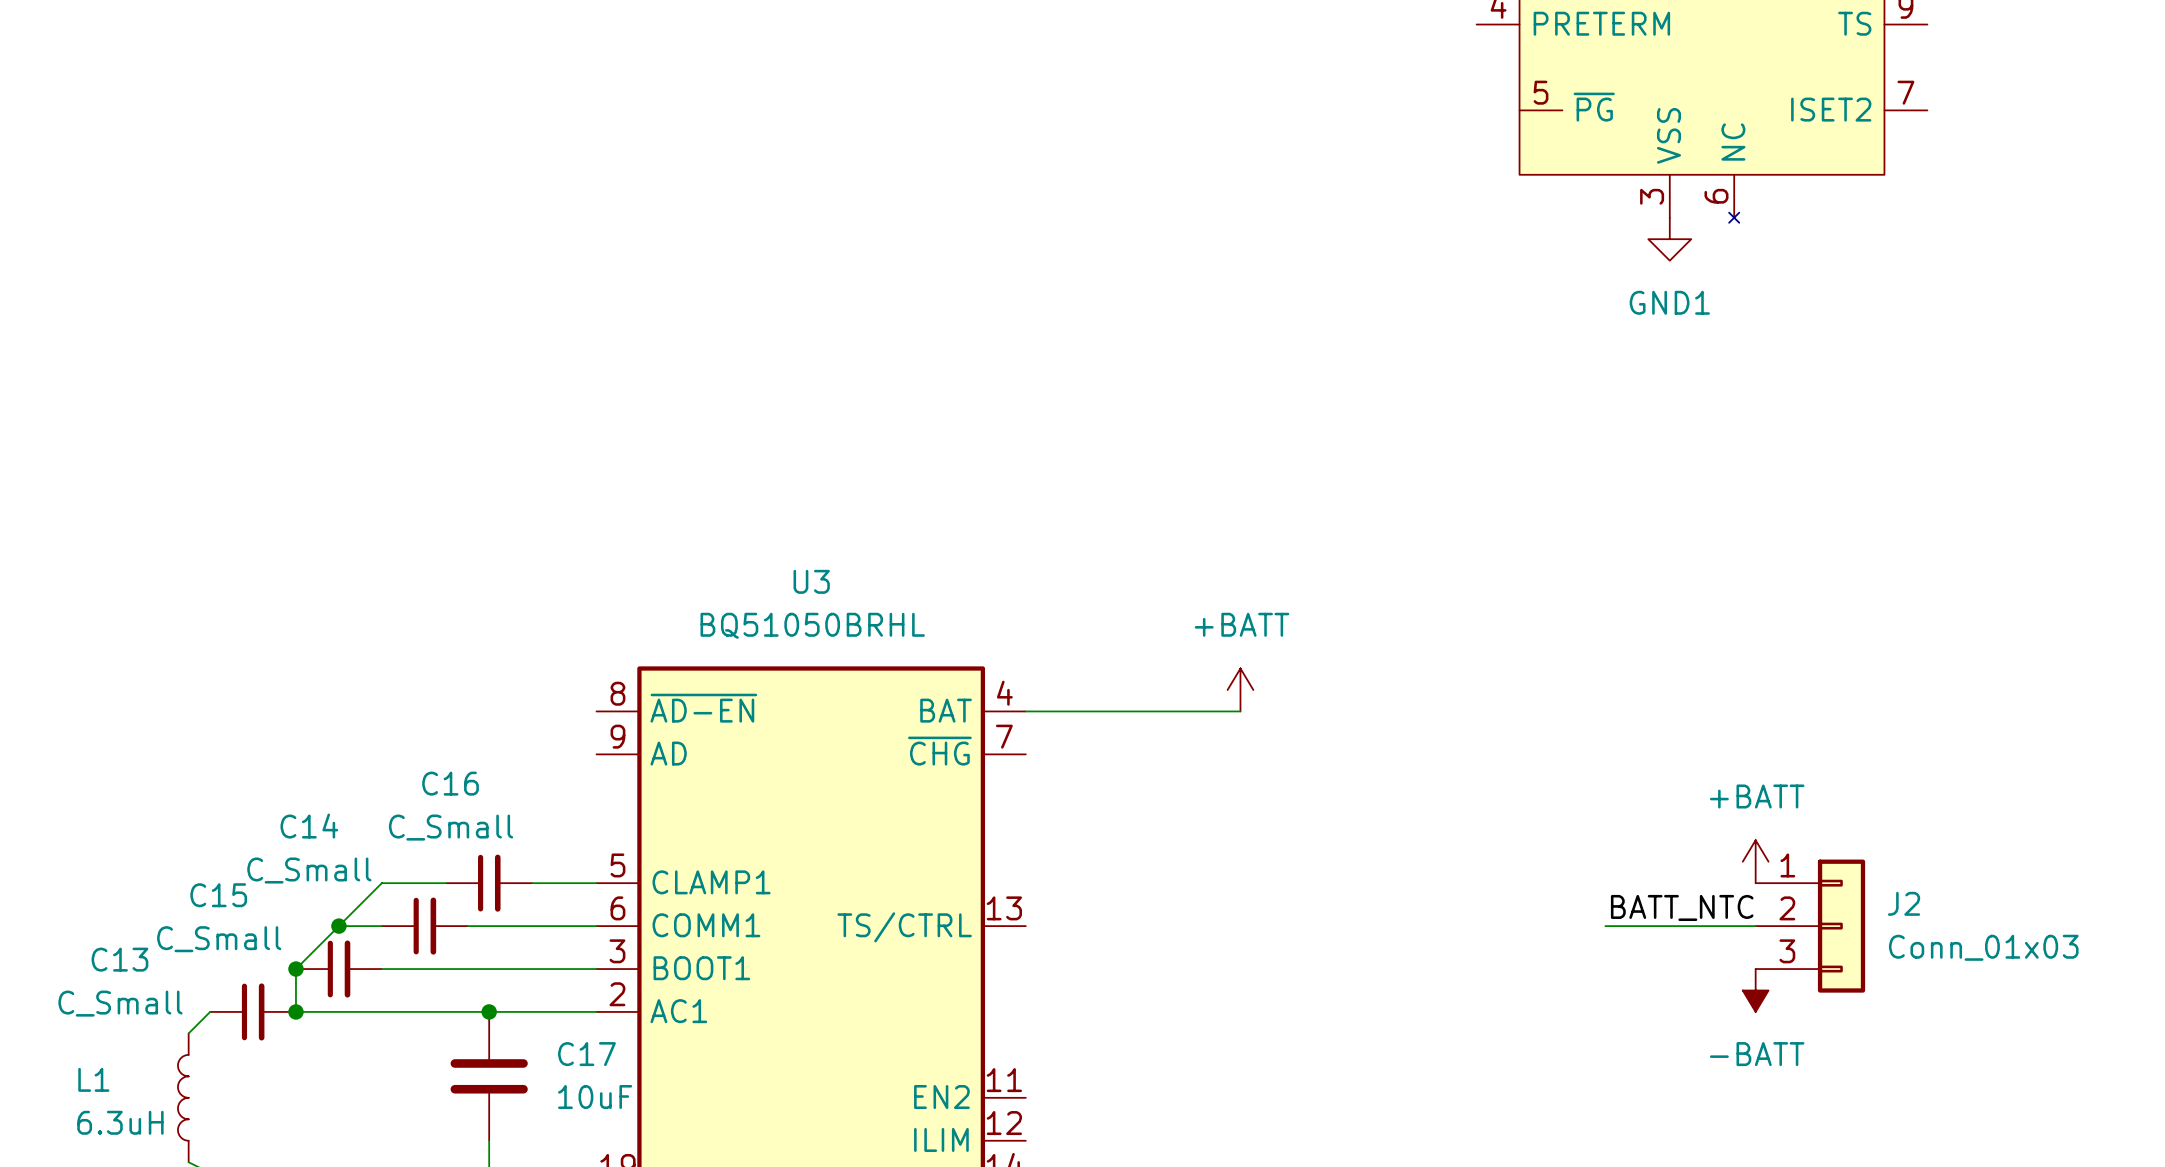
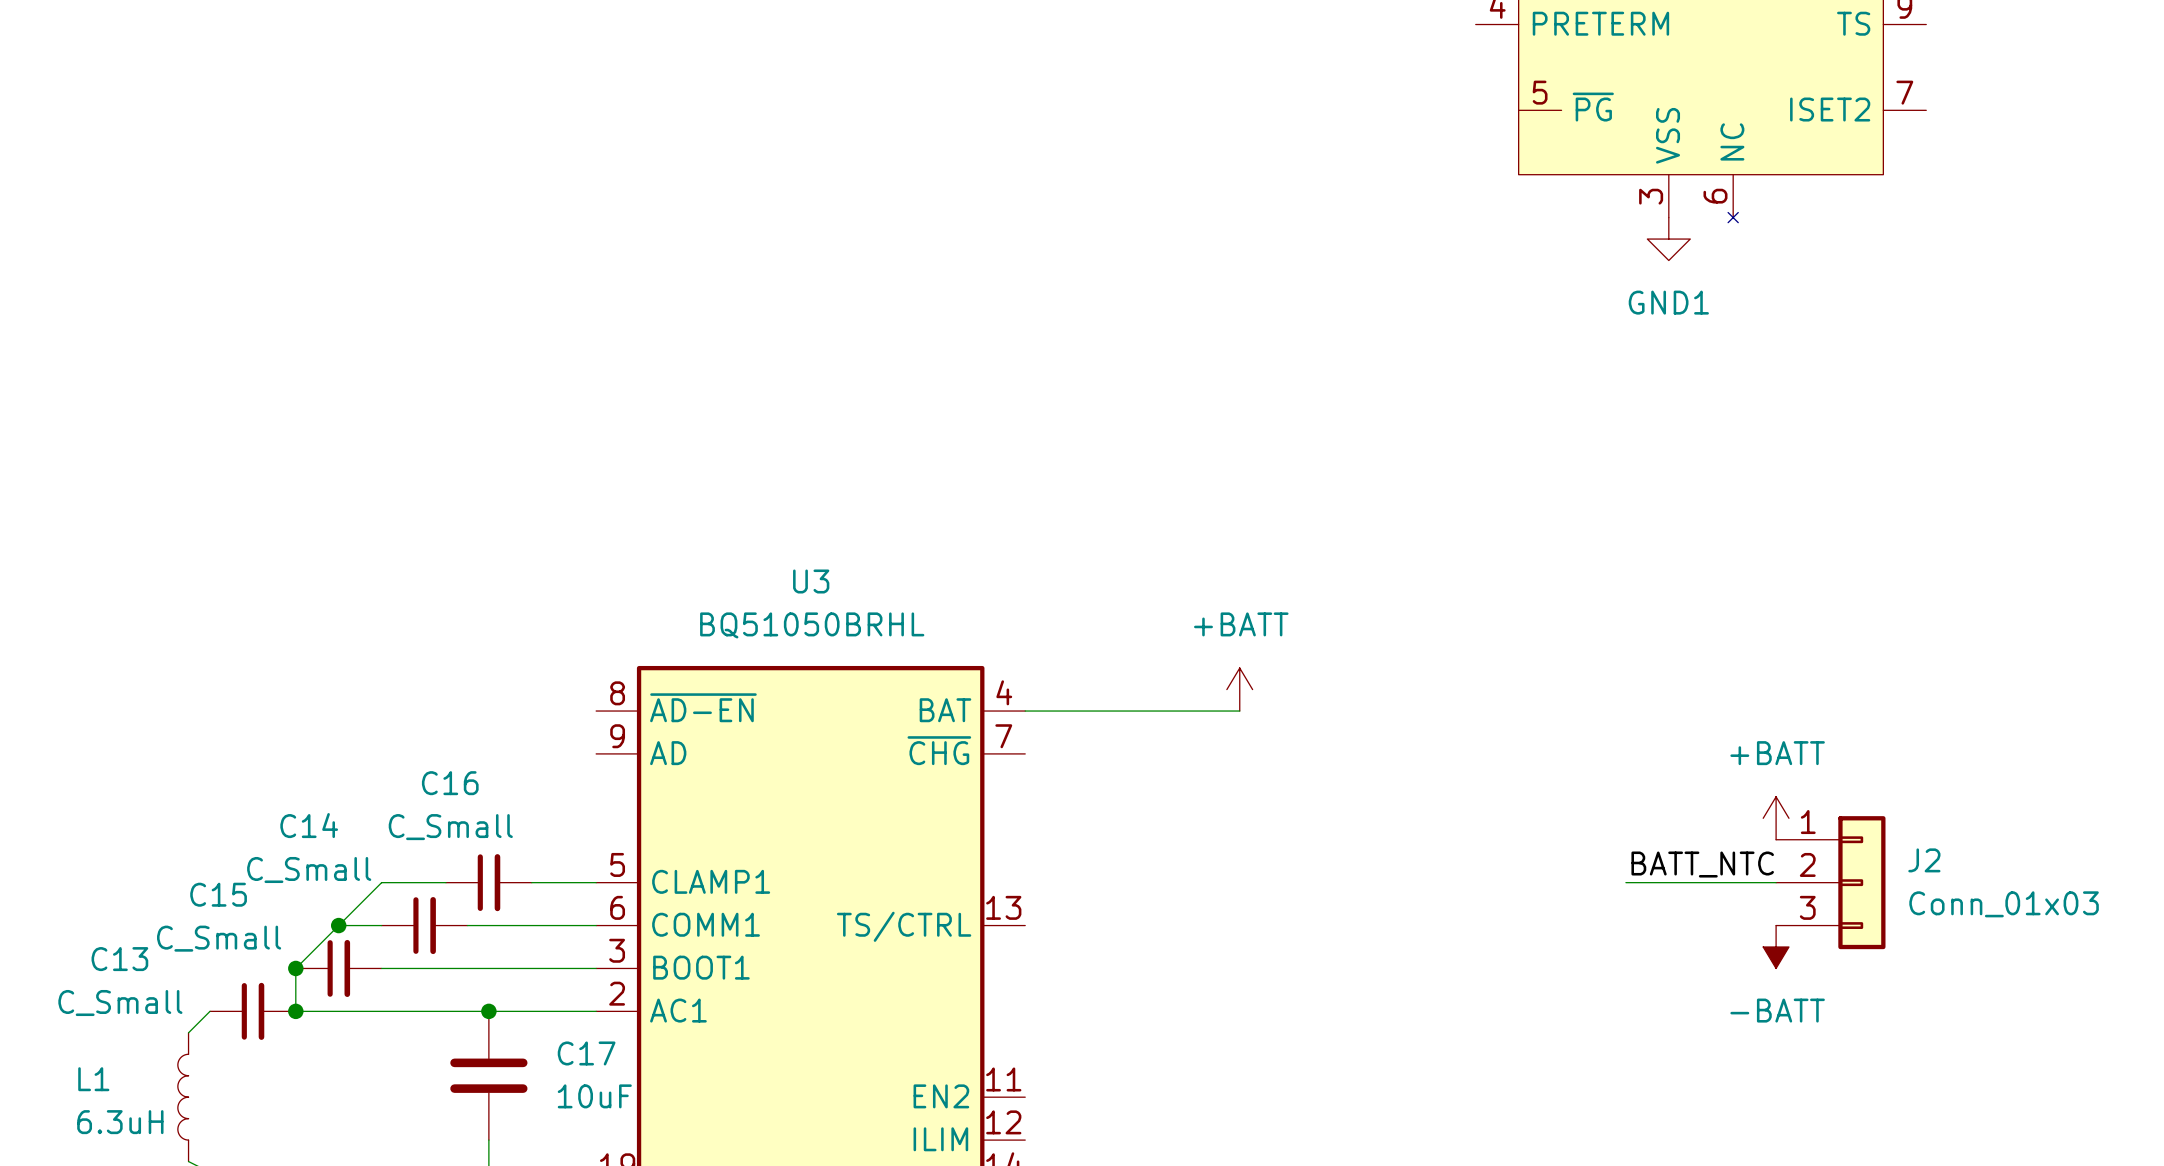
power symbol position: +BATT (1755, 861) -> +BATT (1776, 818)
label position: BATT_NTC (1682, 907) -> BATT_NTC (1702, 864)
wire: (1605, 926) (1755, 926) -> (1625, 882) (1776, 882)
J2 position: (1810, 926) -> (1830, 882)
power symbol position: -BATT (1755, 990) -> -BATT (1776, 947)

